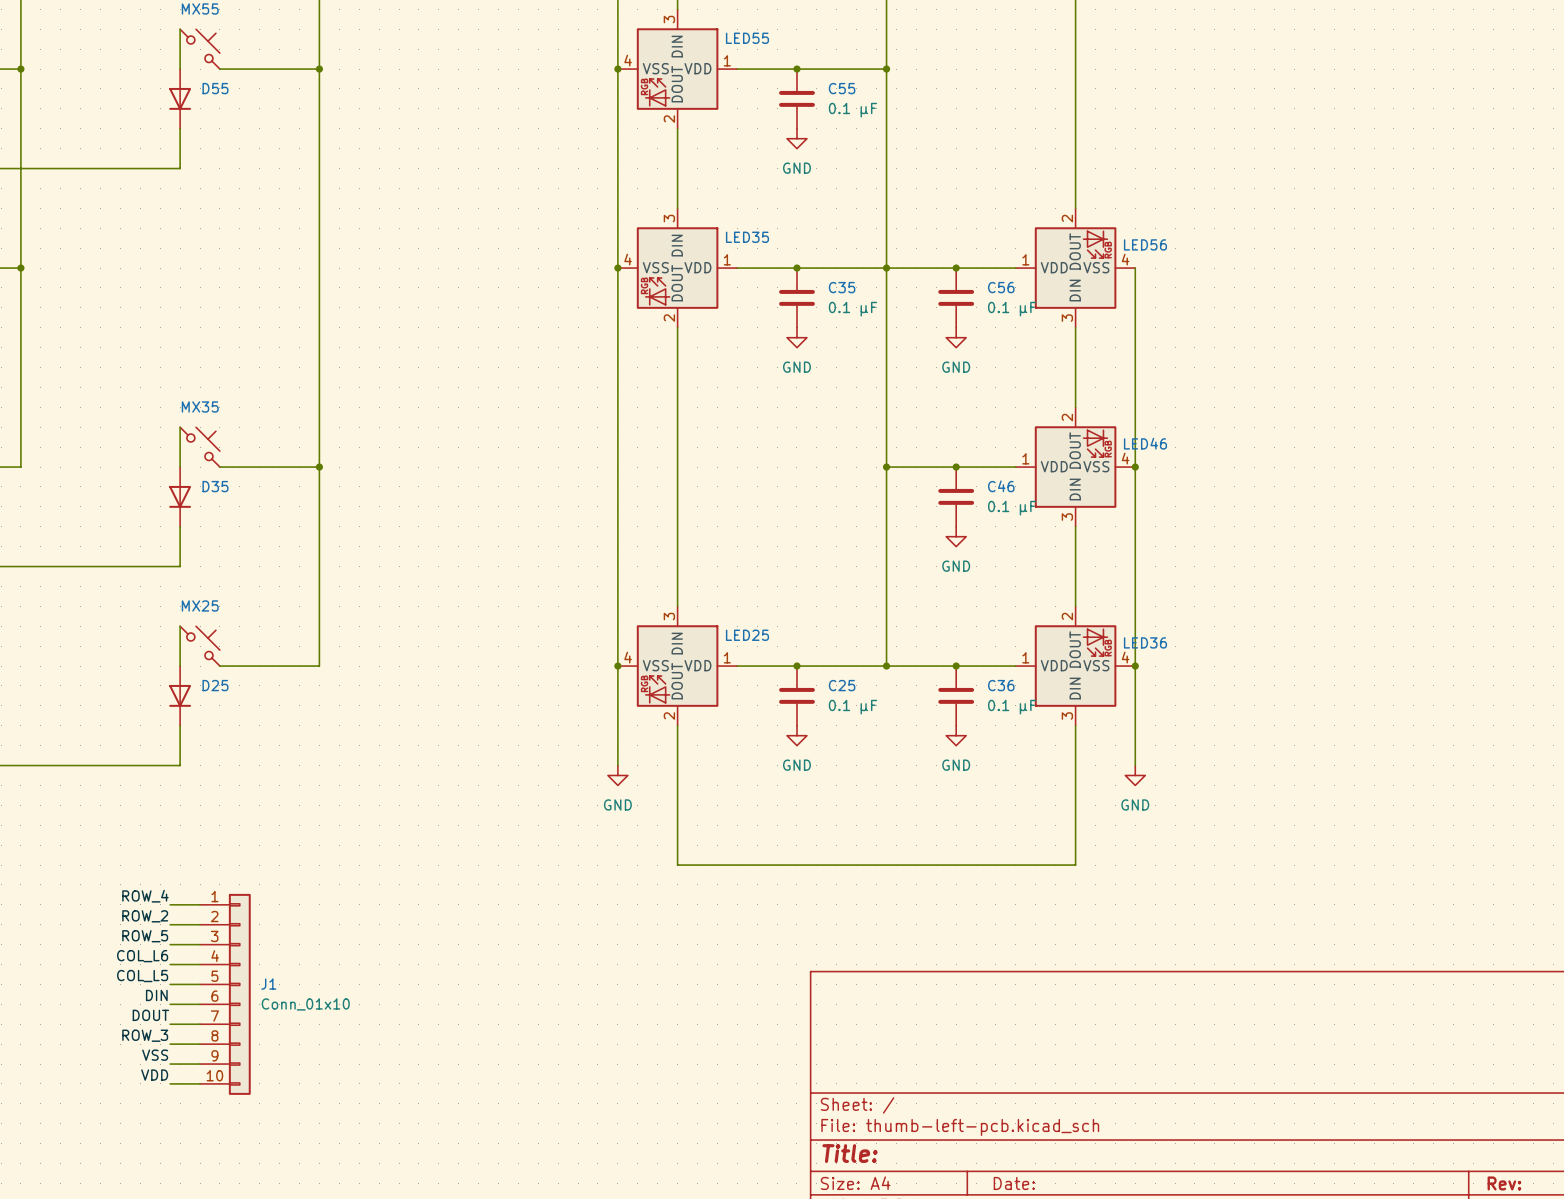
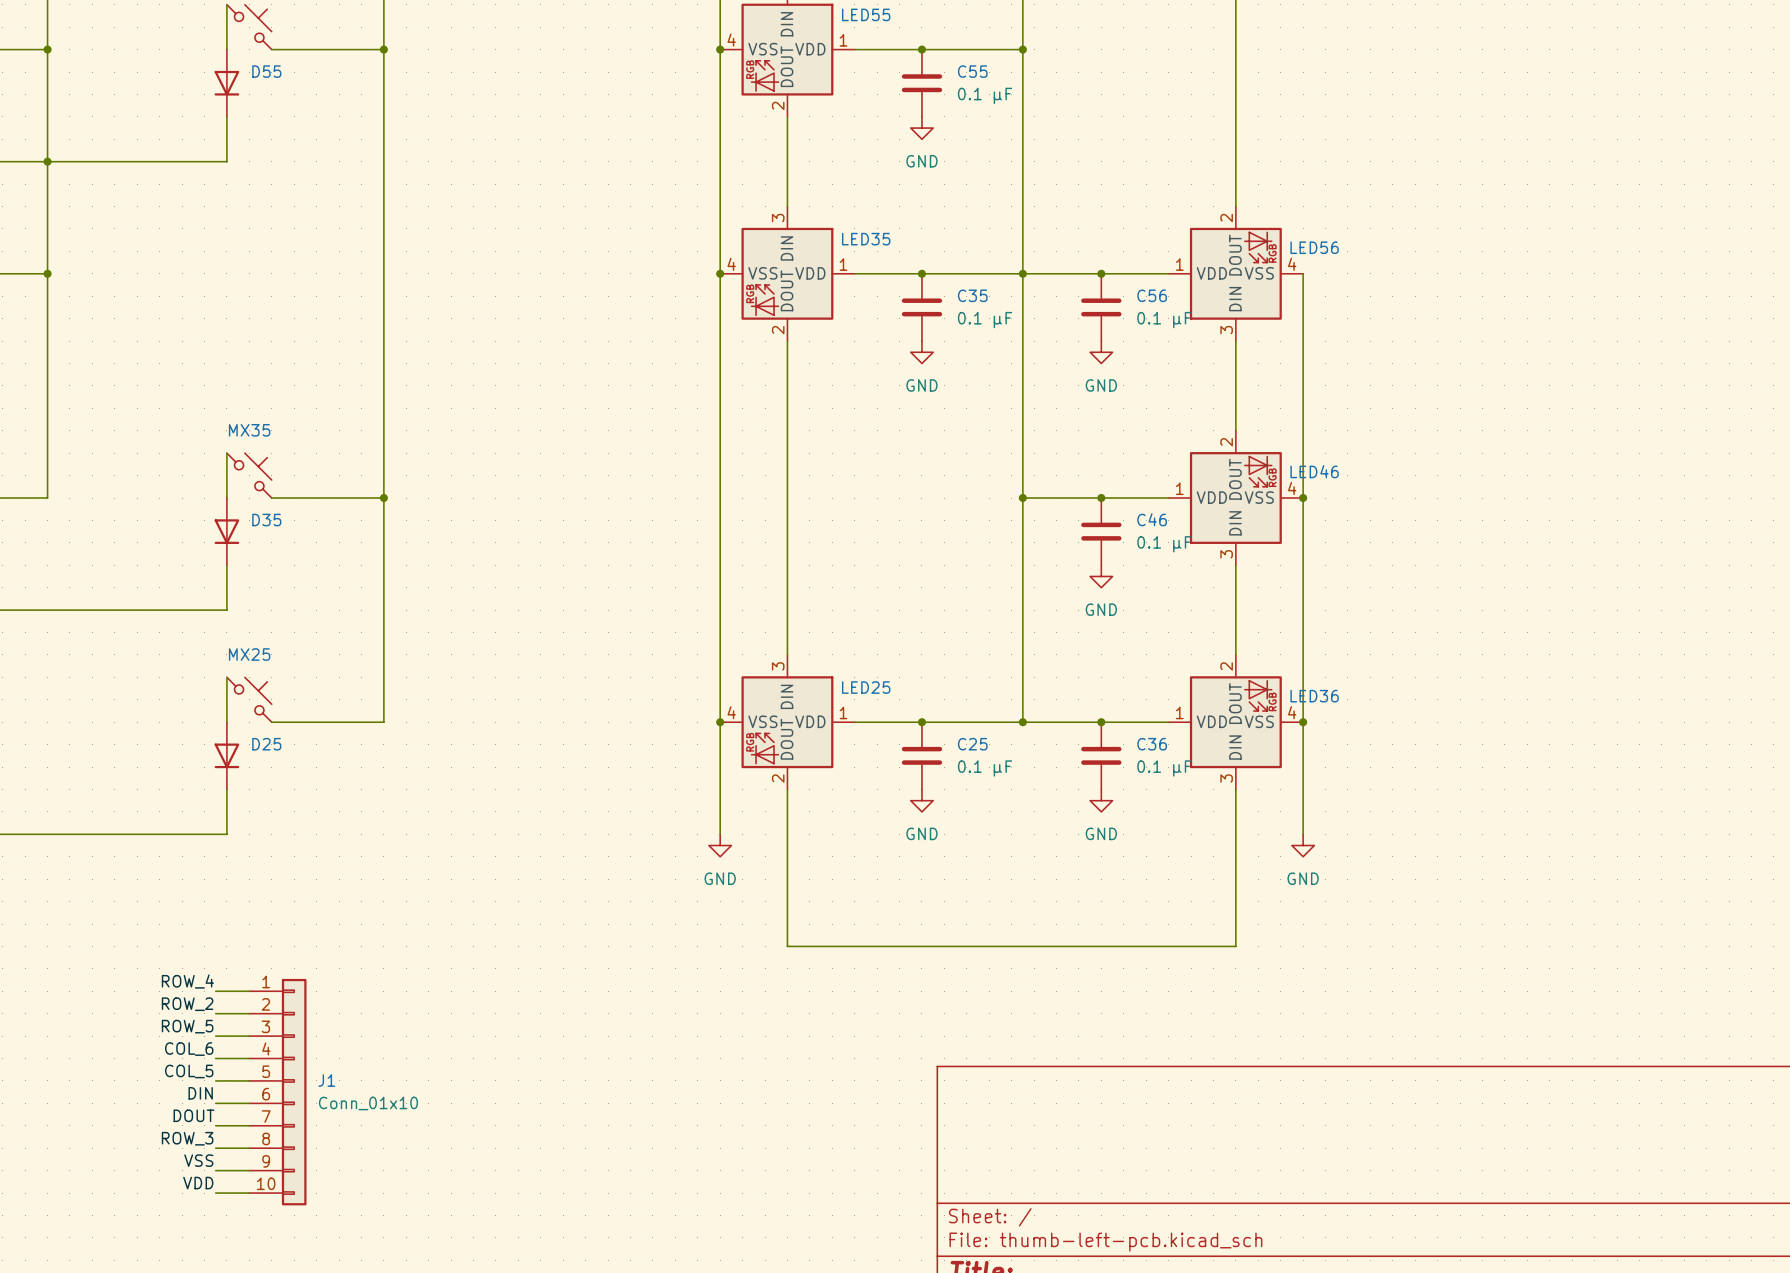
junction: none -> (47, 161)
label: COL_L6 (142, 956) -> COL_6 (189, 1049)
label: COL_L5 (142, 976) -> COL_5 (189, 1071)

